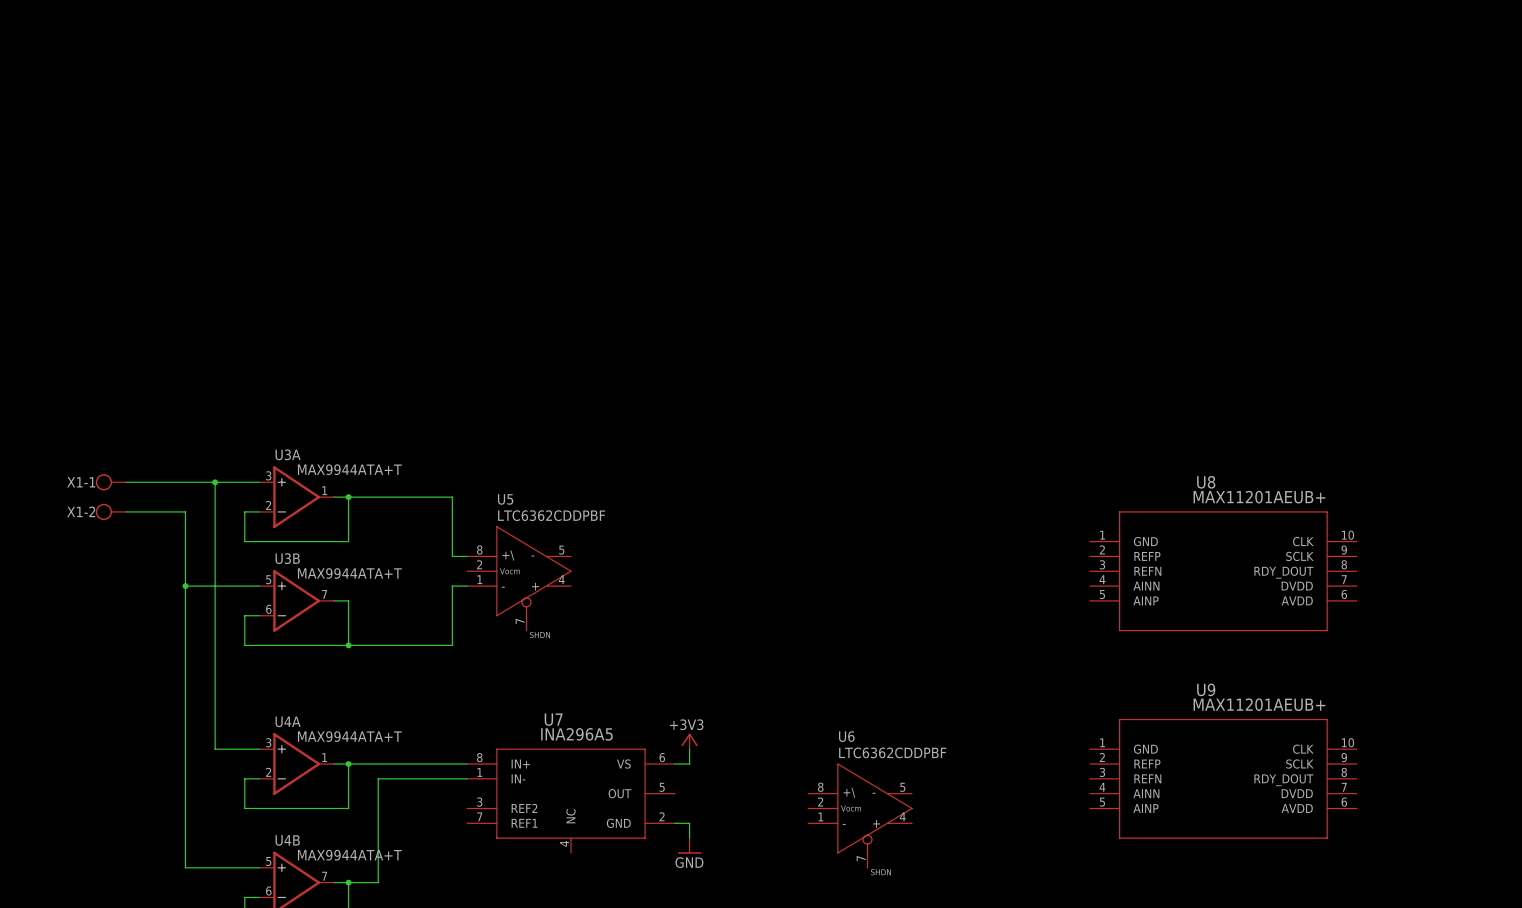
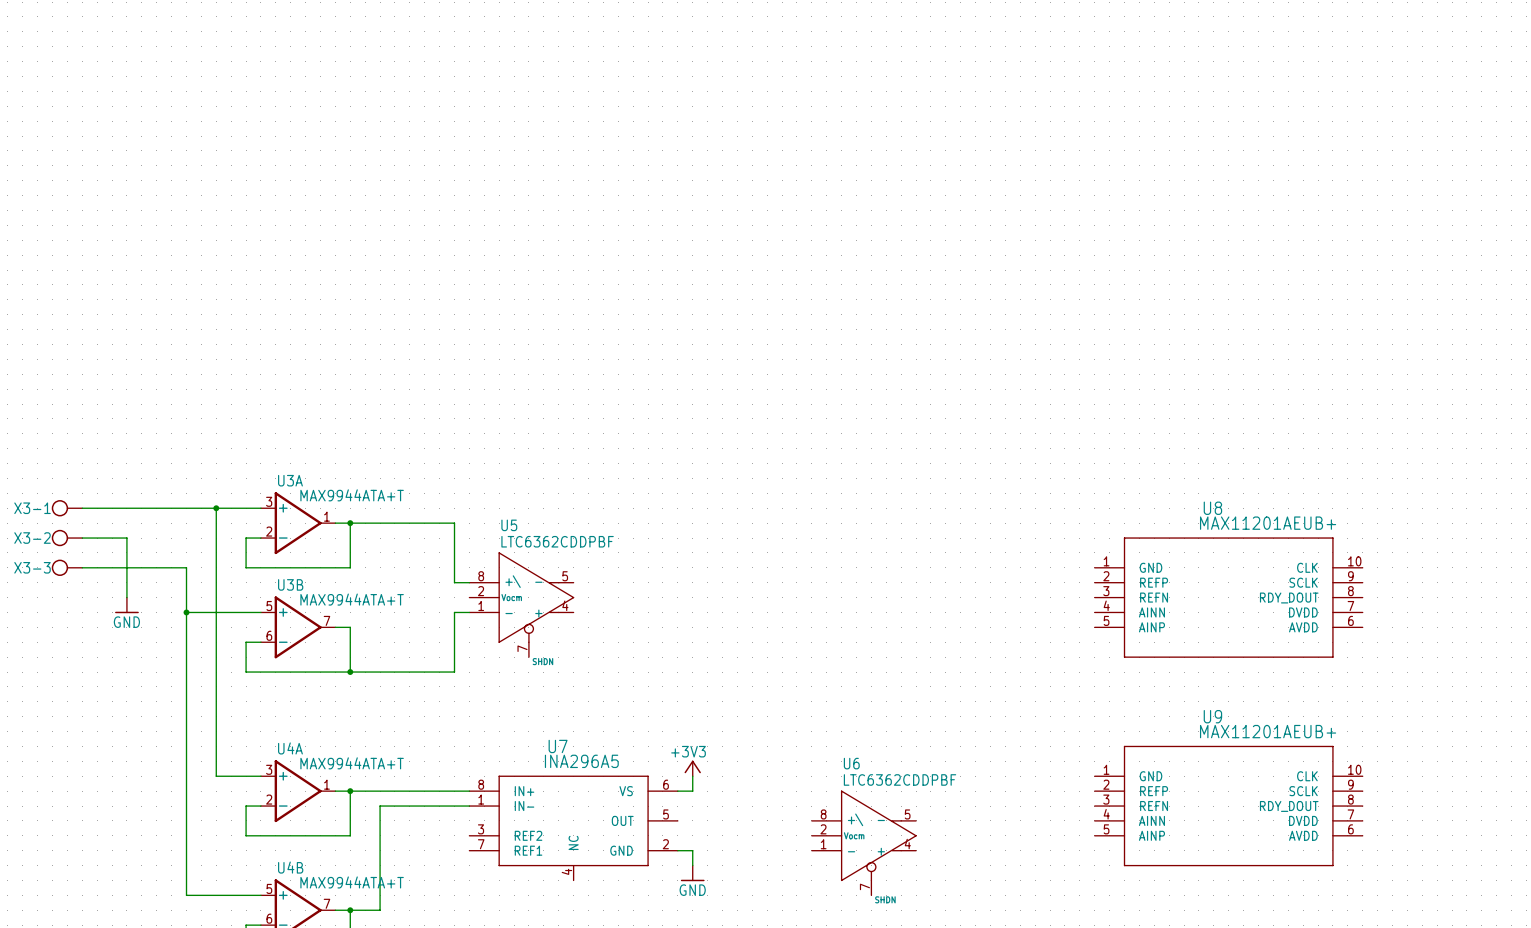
X3-1: none -> (67, 508)
wire: none -> (82, 508) (126, 508)
X1-1: (110, 482) -> none
X3-2: none -> (67, 538)
wire: none -> (82, 538) (126, 538) (126, 597)
X1-2: (110, 511) -> none
wire: (126, 511) (185, 511) (185, 541) -> (82, 567) (186, 567)
X3-3: none -> (67, 567)
power symbol: none -> GND (126, 605)

